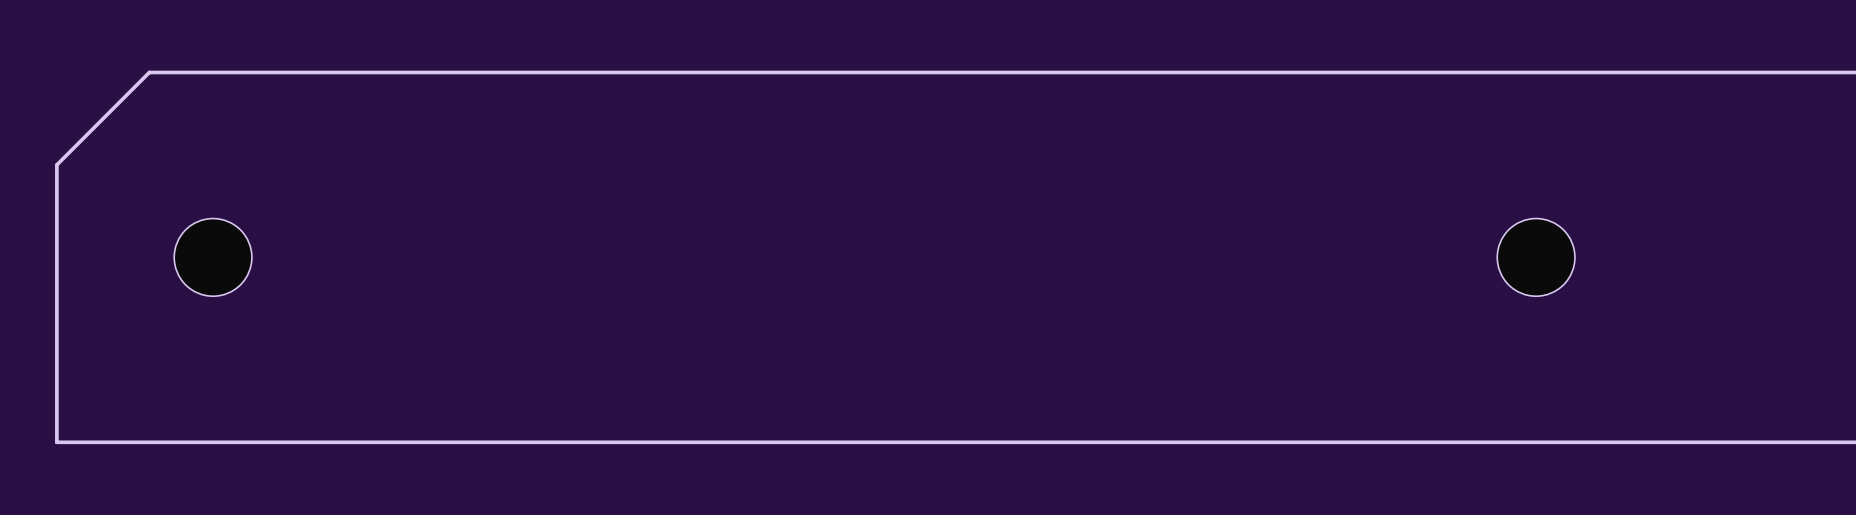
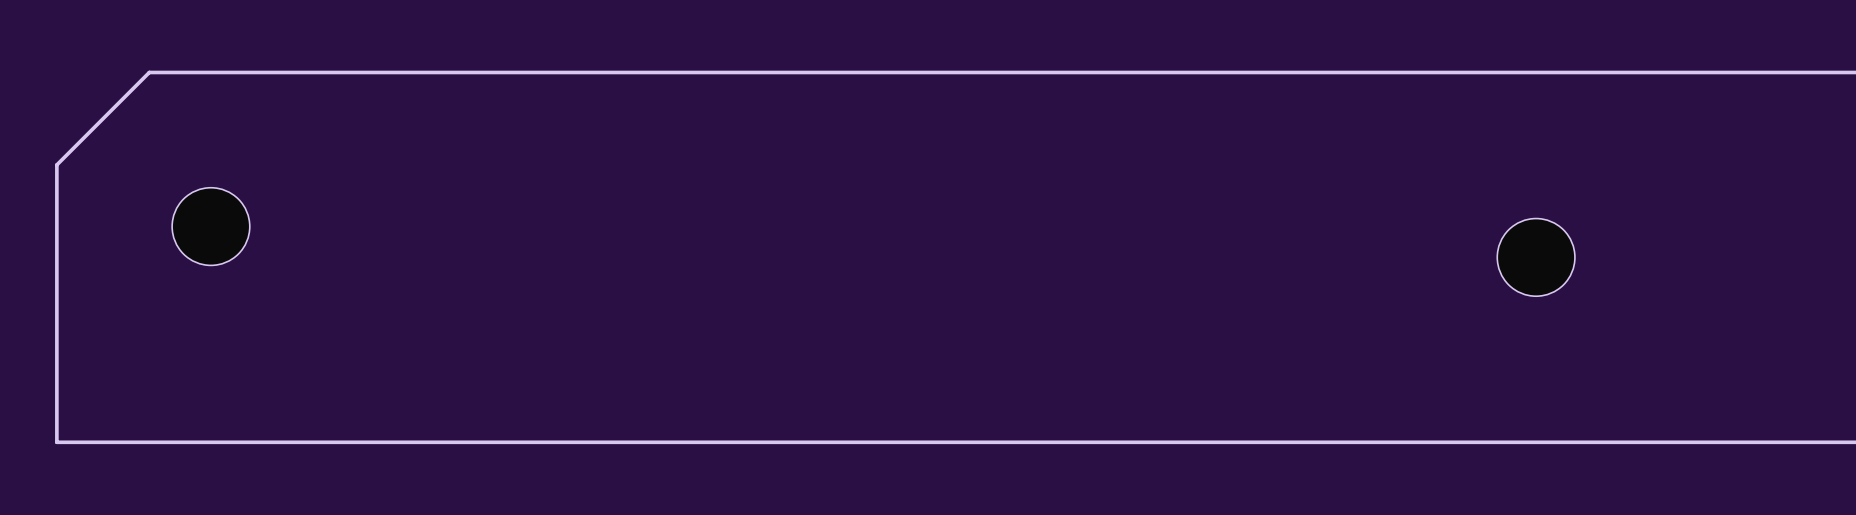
part position: (213, 257) -> (210, 226)

